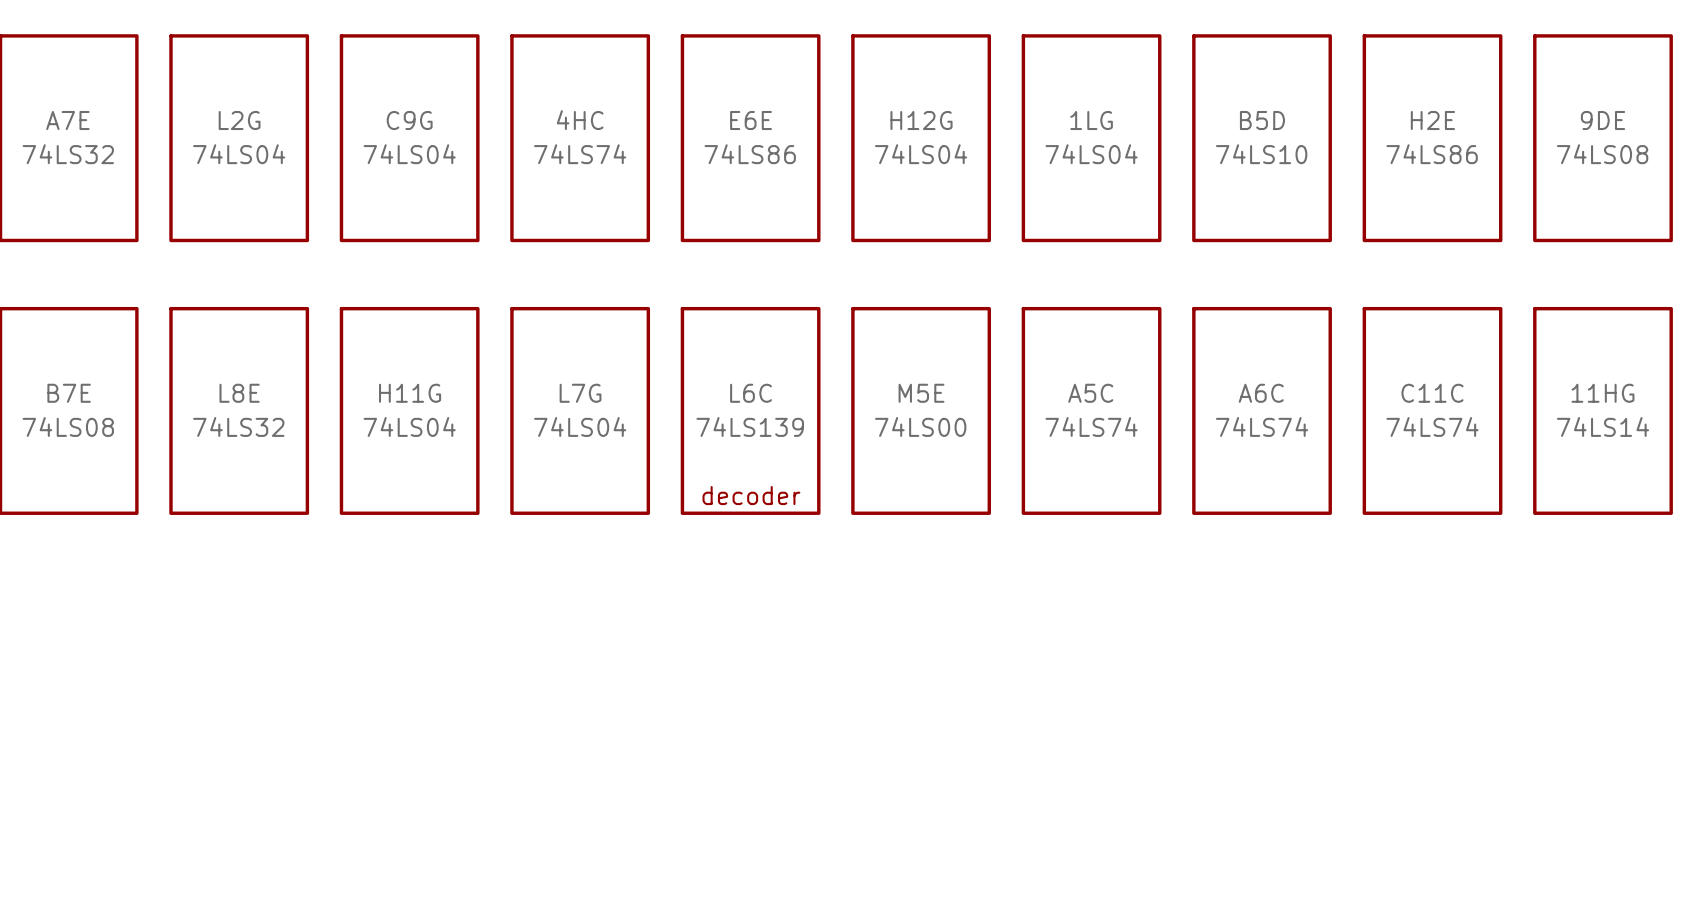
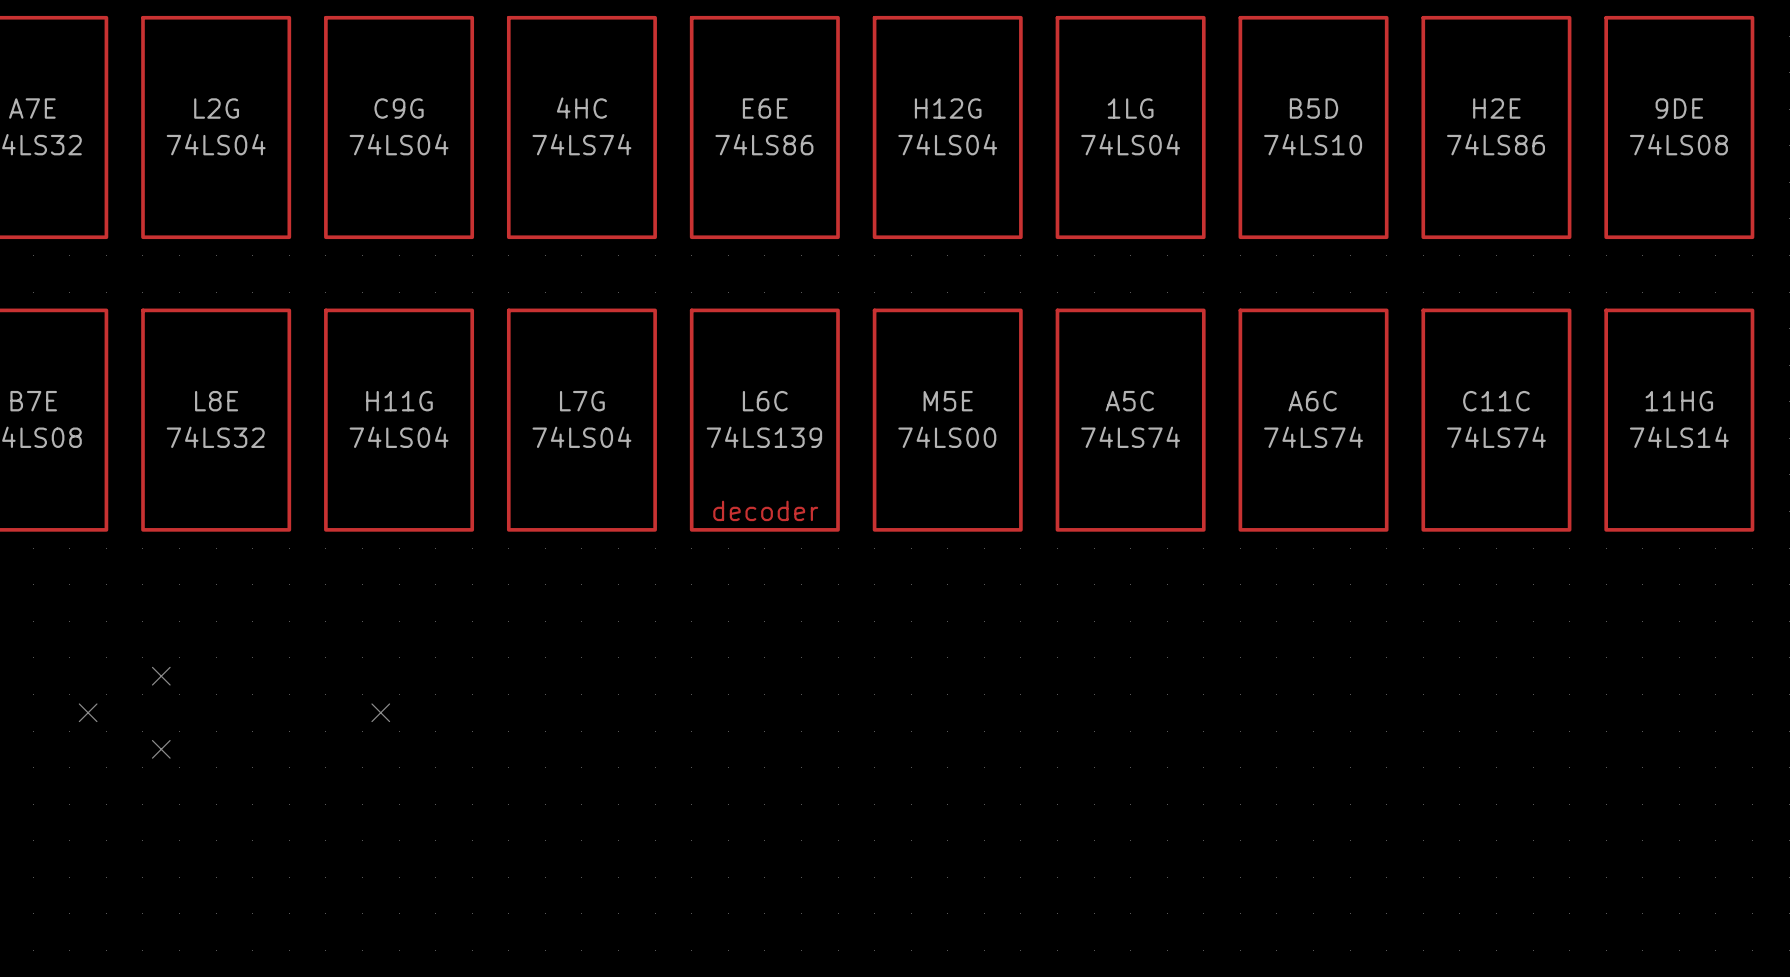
no-connect mark: none -> (161, 676)
no-connect mark: none -> (88, 712)
no-connect mark: none -> (380, 712)
no-connect mark: none -> (161, 749)

